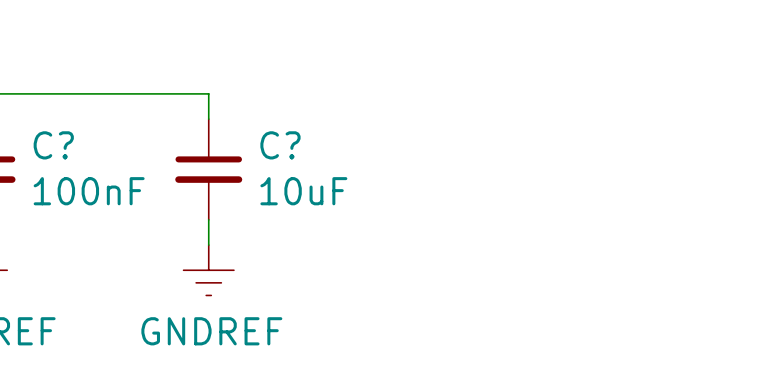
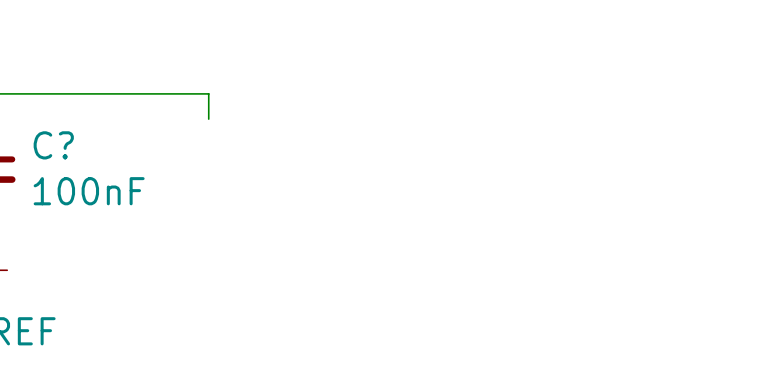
C?: 10uF (208, 169) -> none
wire: (208, 219) (208, 245) -> none
power symbol: GNDREF (208, 270) -> none

